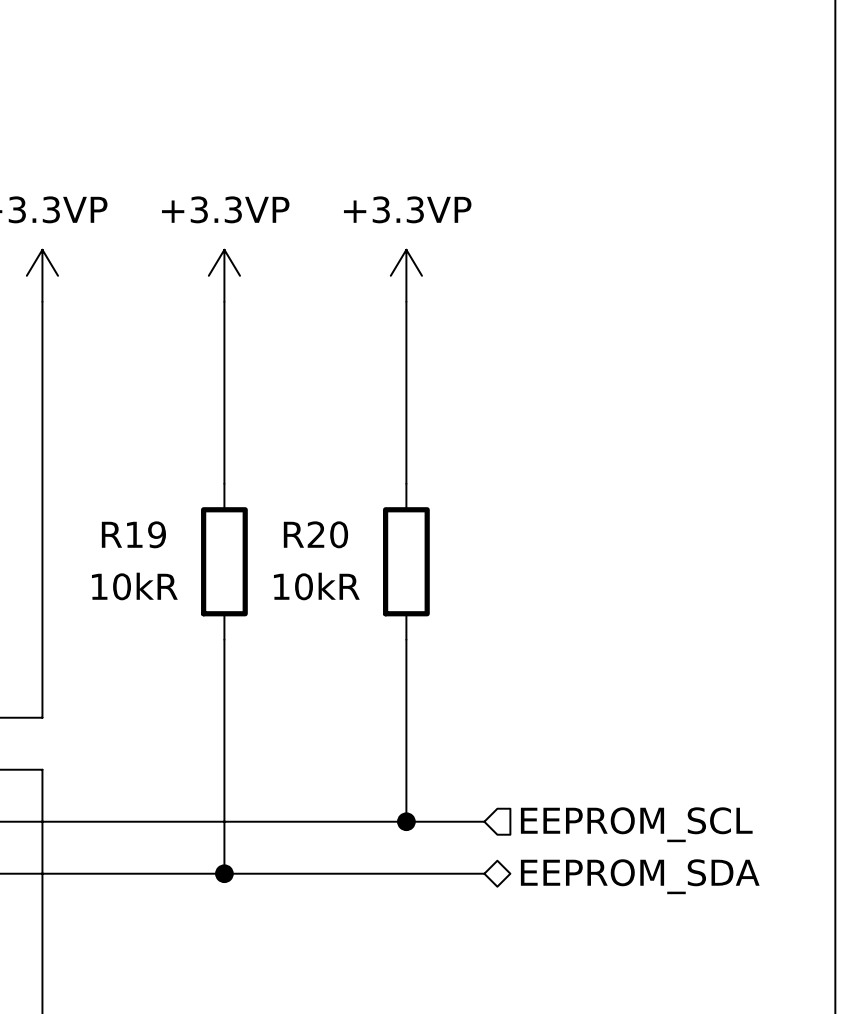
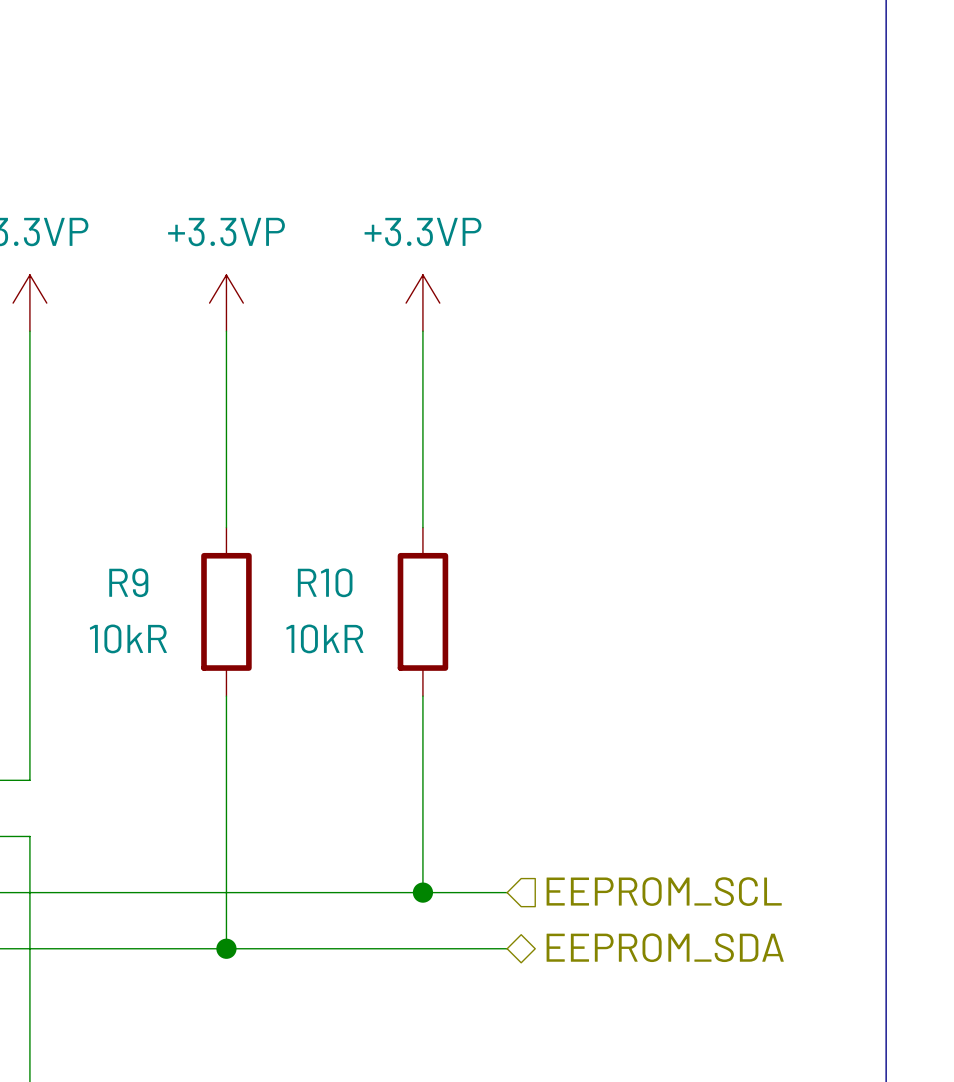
R19 name: R19 (133, 534) -> R9 (128, 582)
R20 name: R20 (315, 534) -> R10 (325, 582)

